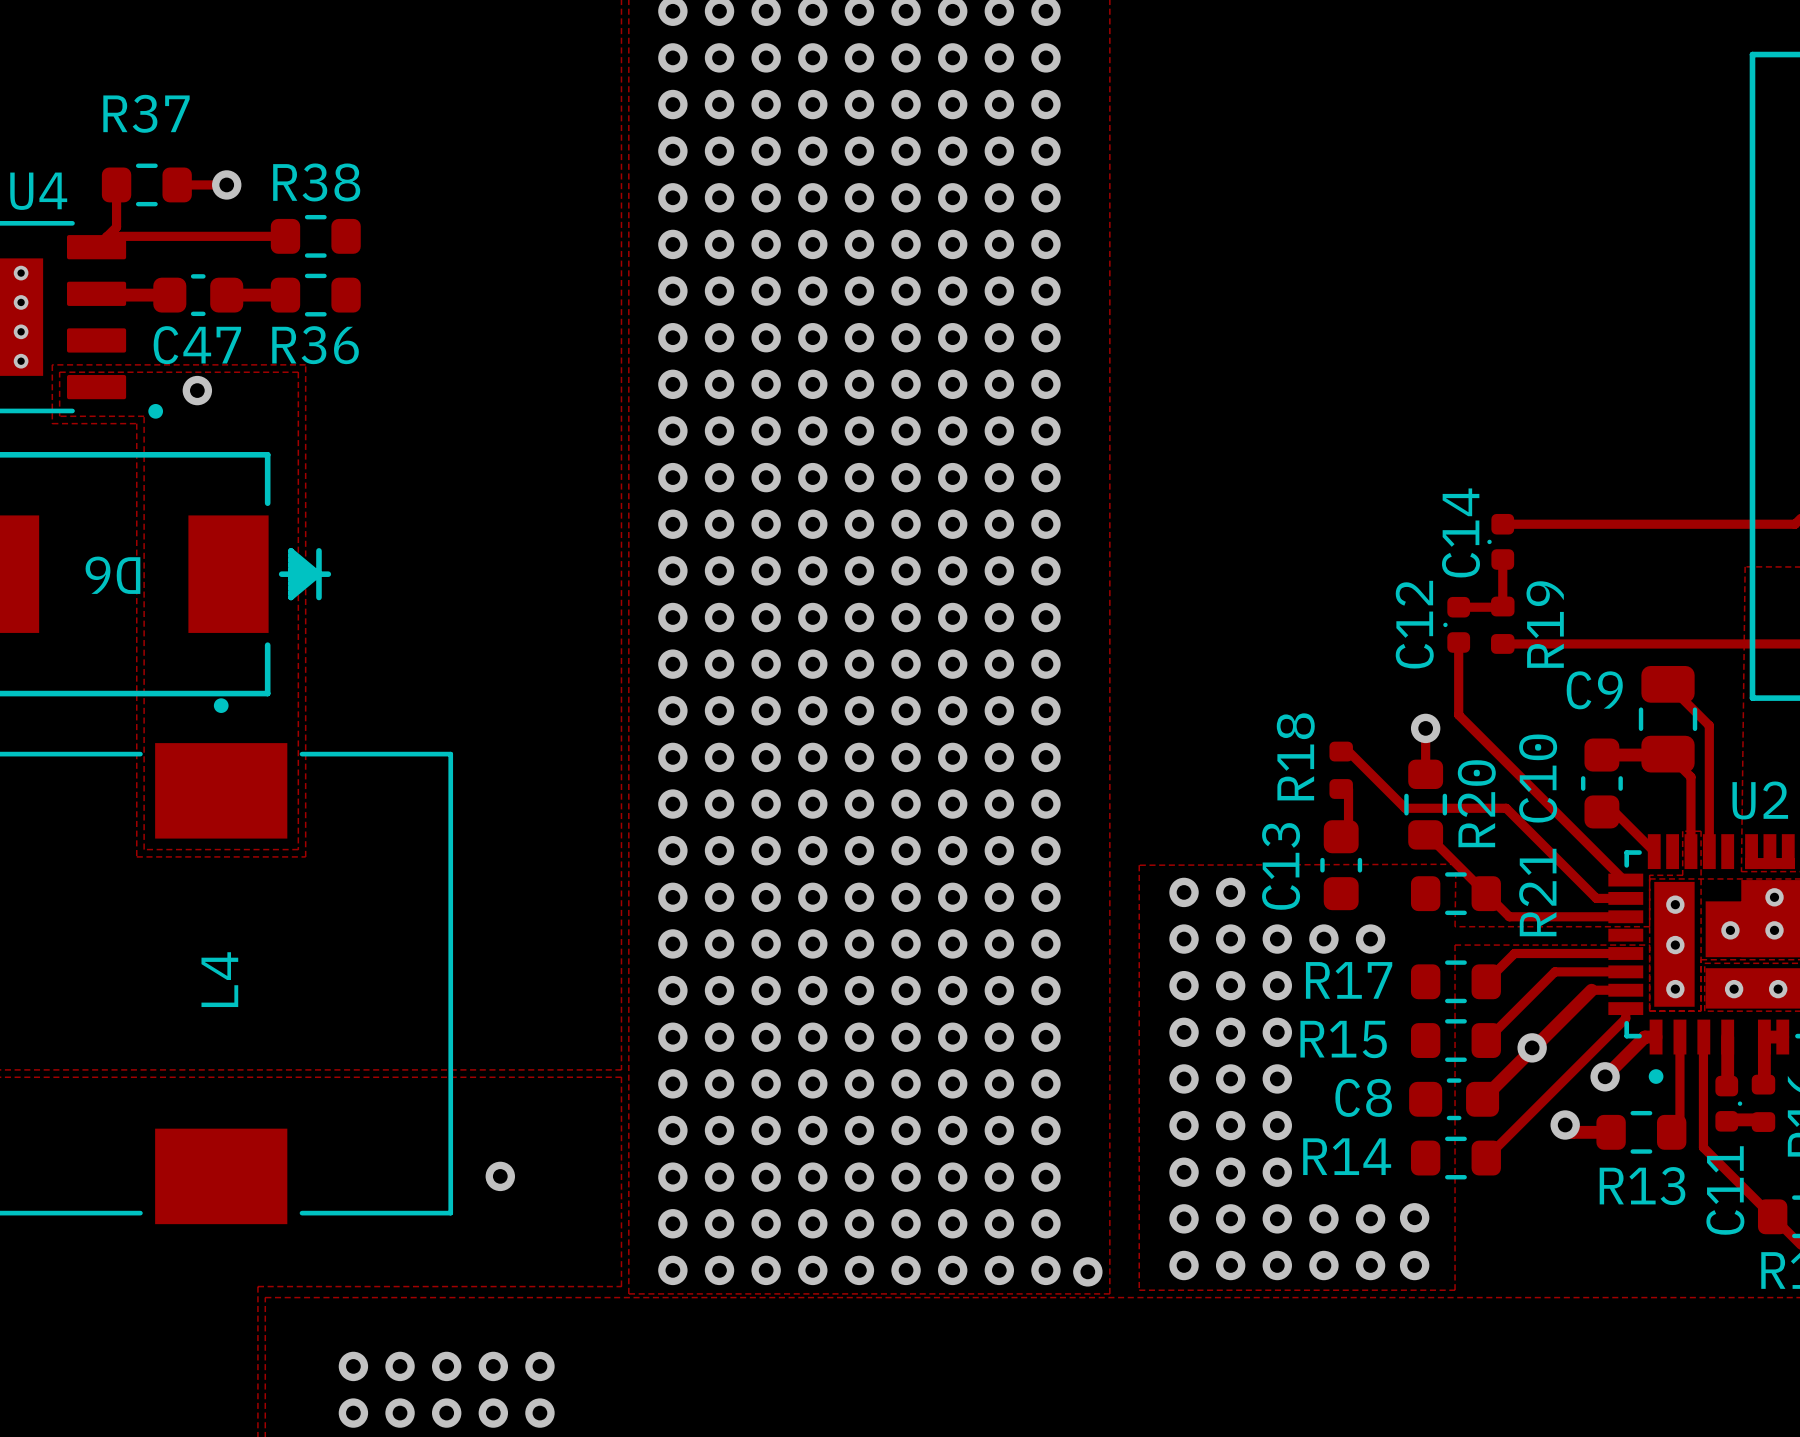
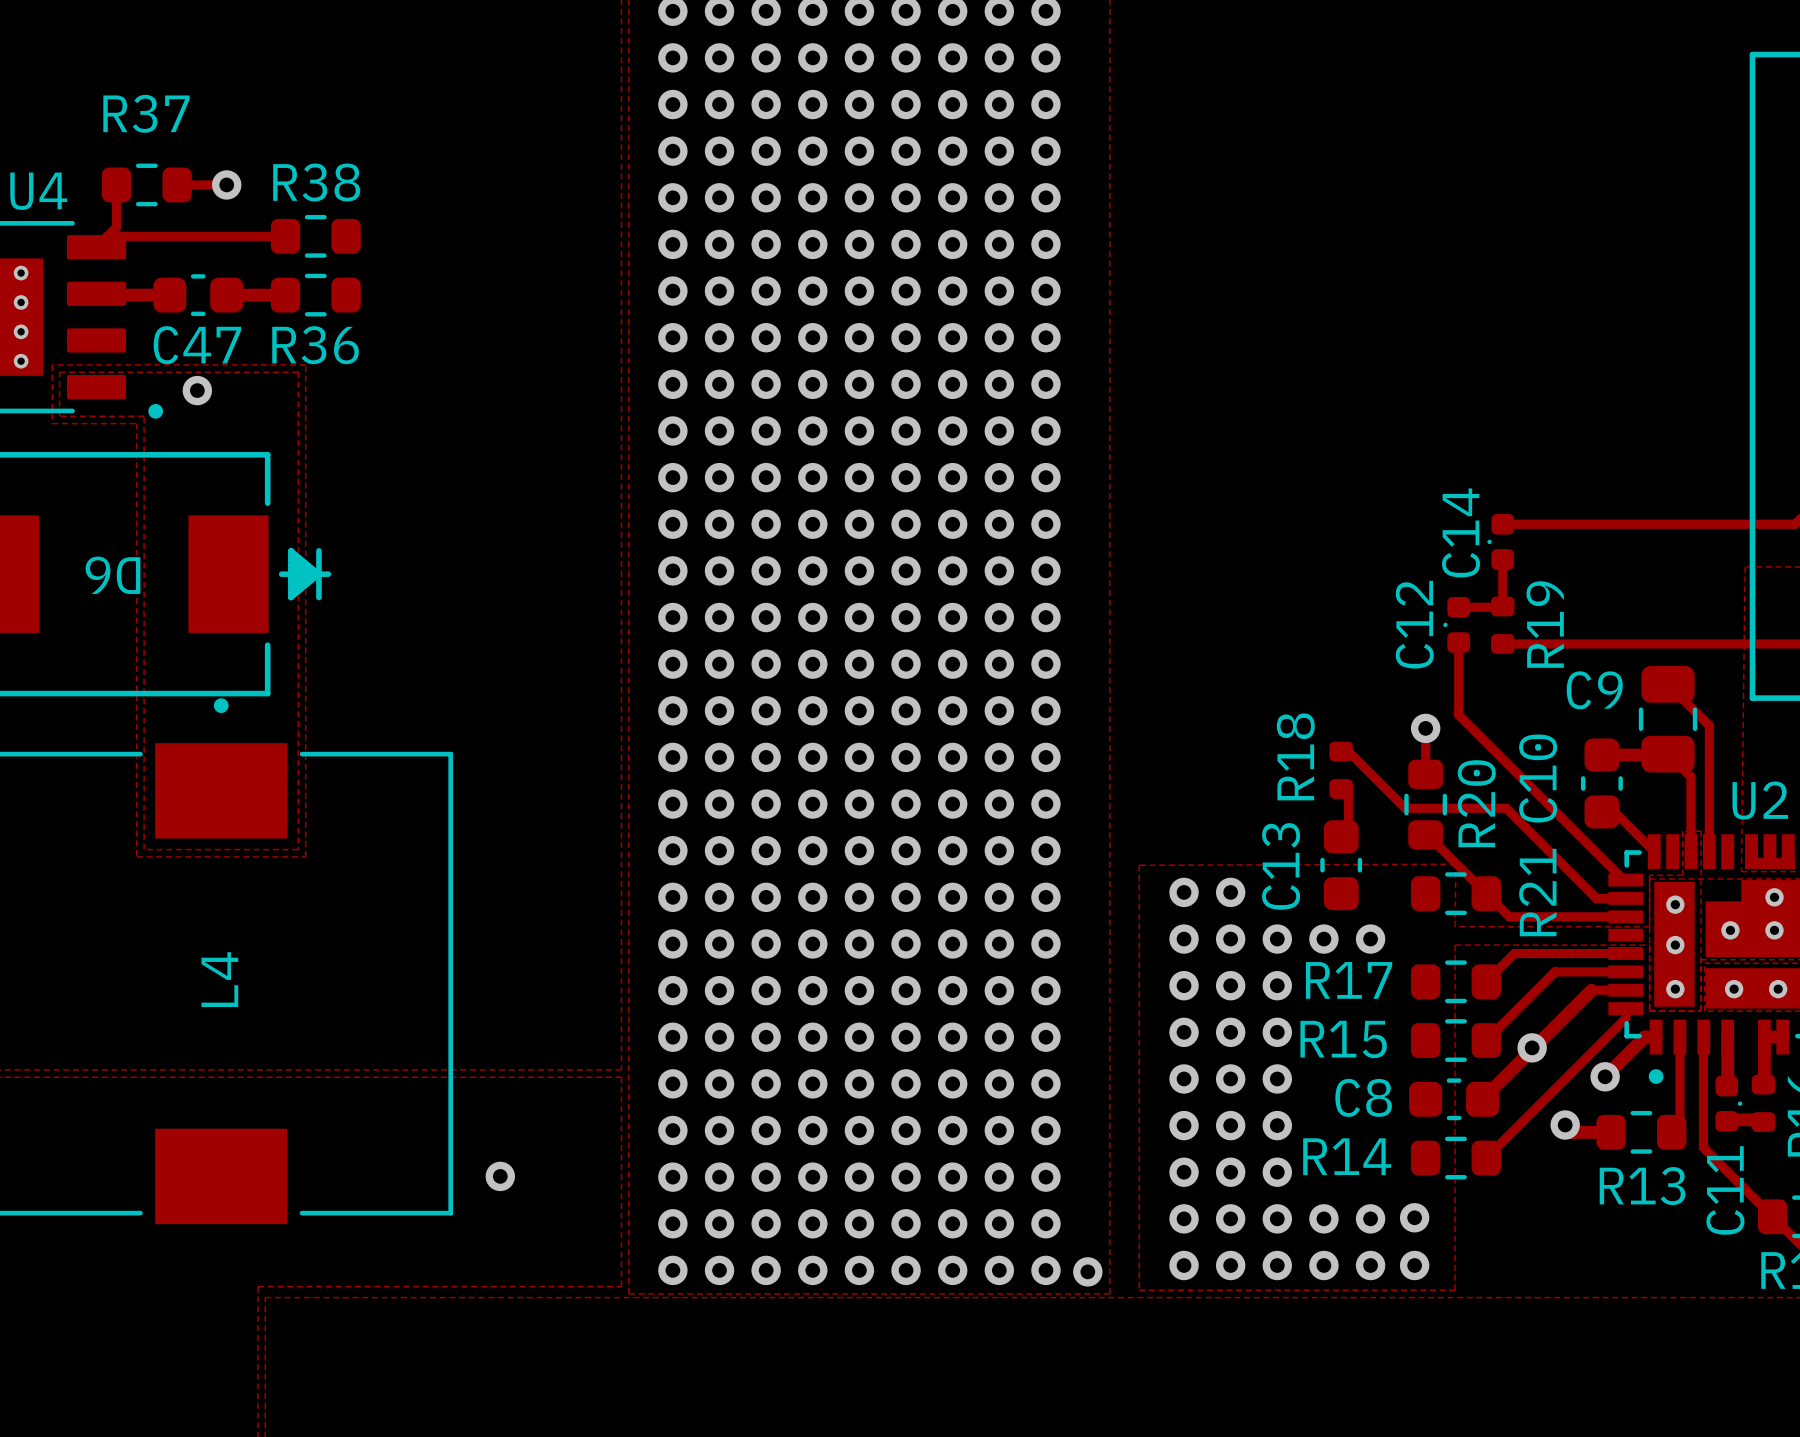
via: (353, 1366) -> none
via: (400, 1366) -> none
via: (446, 1366) -> none
via: (493, 1366) -> none
via: (539, 1366) -> none
via: (353, 1413) -> none
via: (400, 1413) -> none
via: (446, 1413) -> none
via: (493, 1413) -> none
via: (539, 1413) -> none

